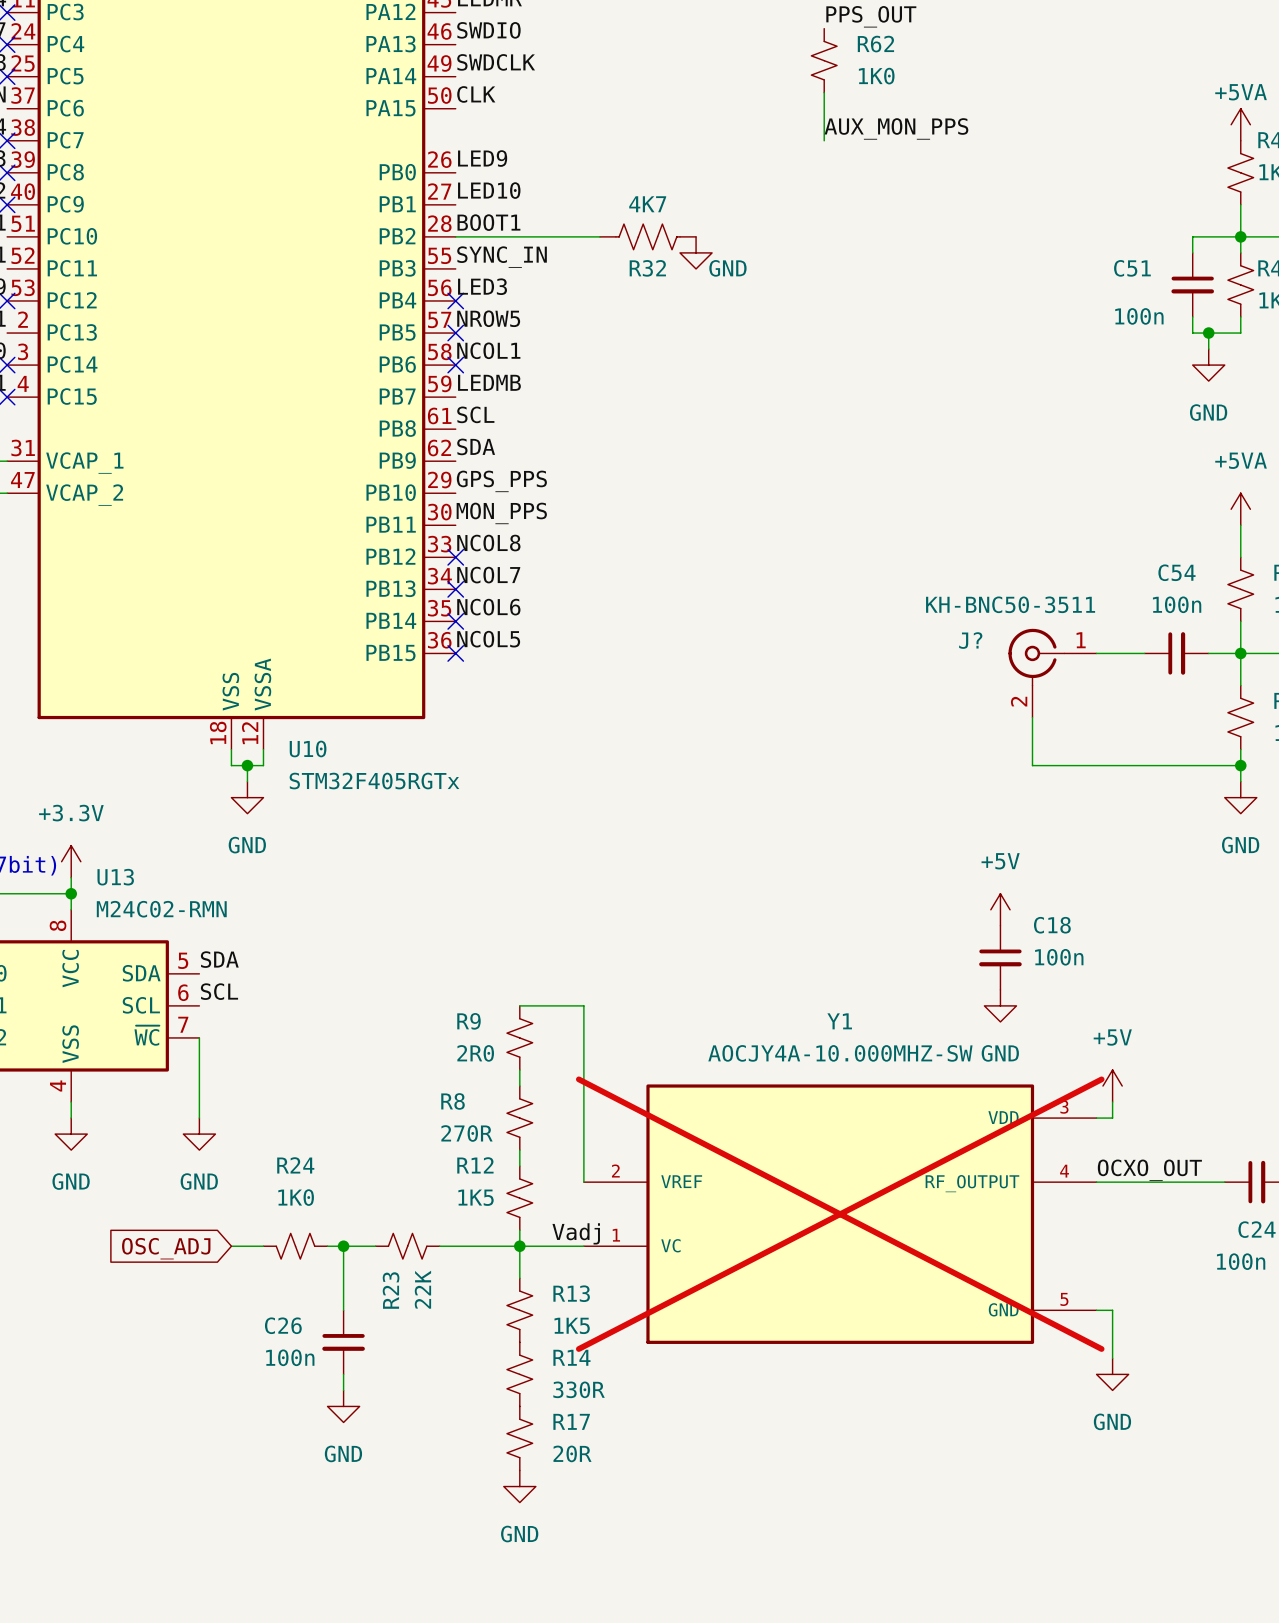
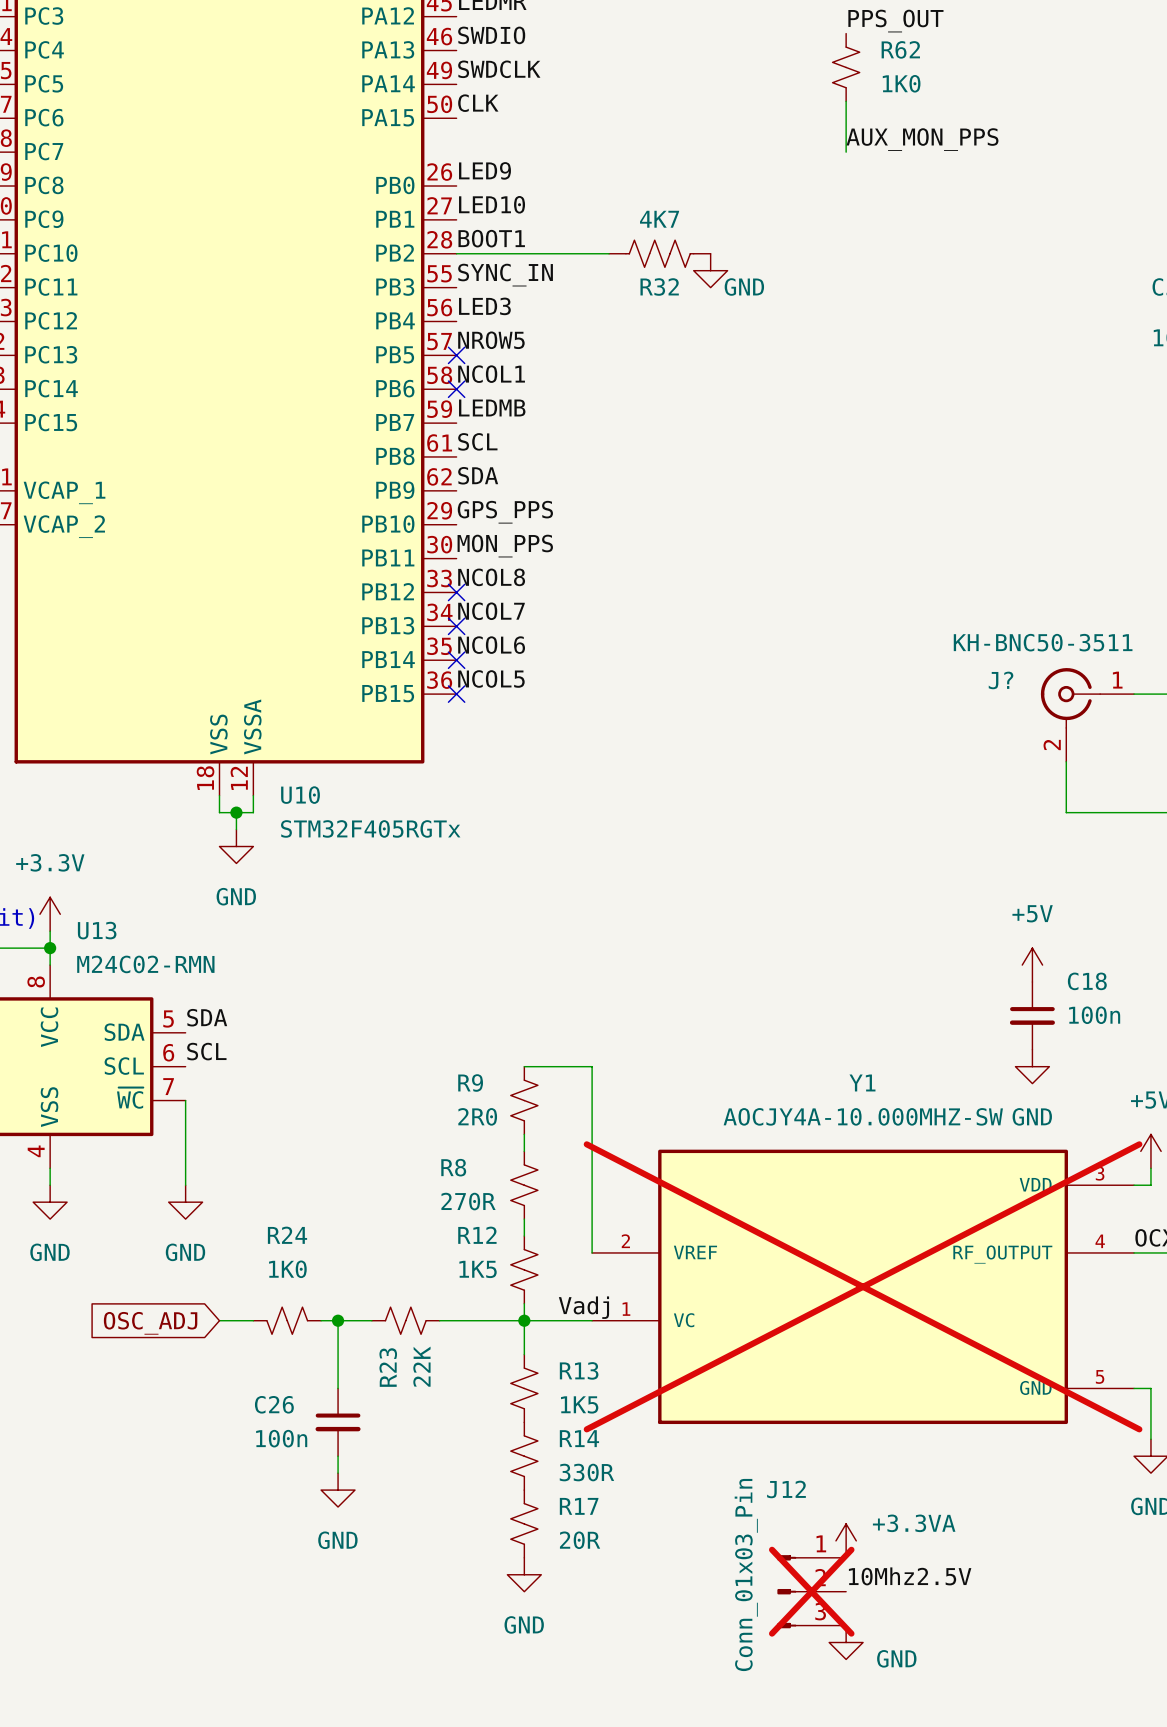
no-connect mark: (455, 300) -> none
power symbol: none -> +3.3VA (846, 1540)
label: none -> 10Mhz2.5V (910, 1576)
J12: none -> Conn_01x03_Pin (811, 1591)
power symbol: none -> GND (846, 1642)

